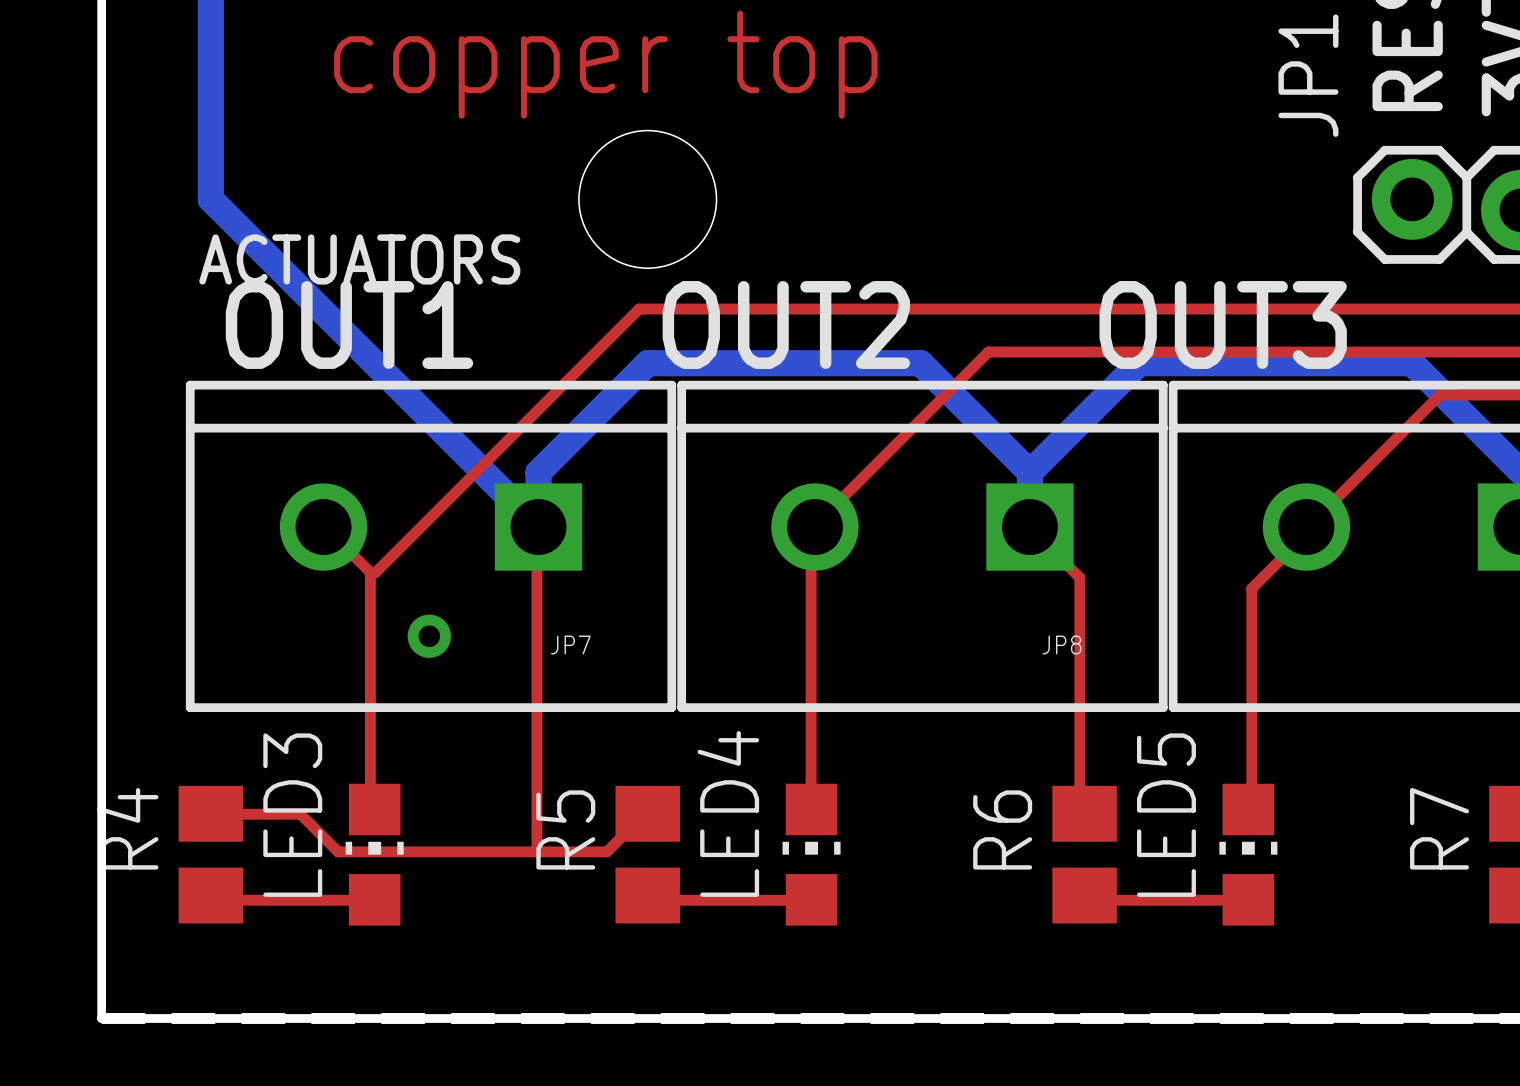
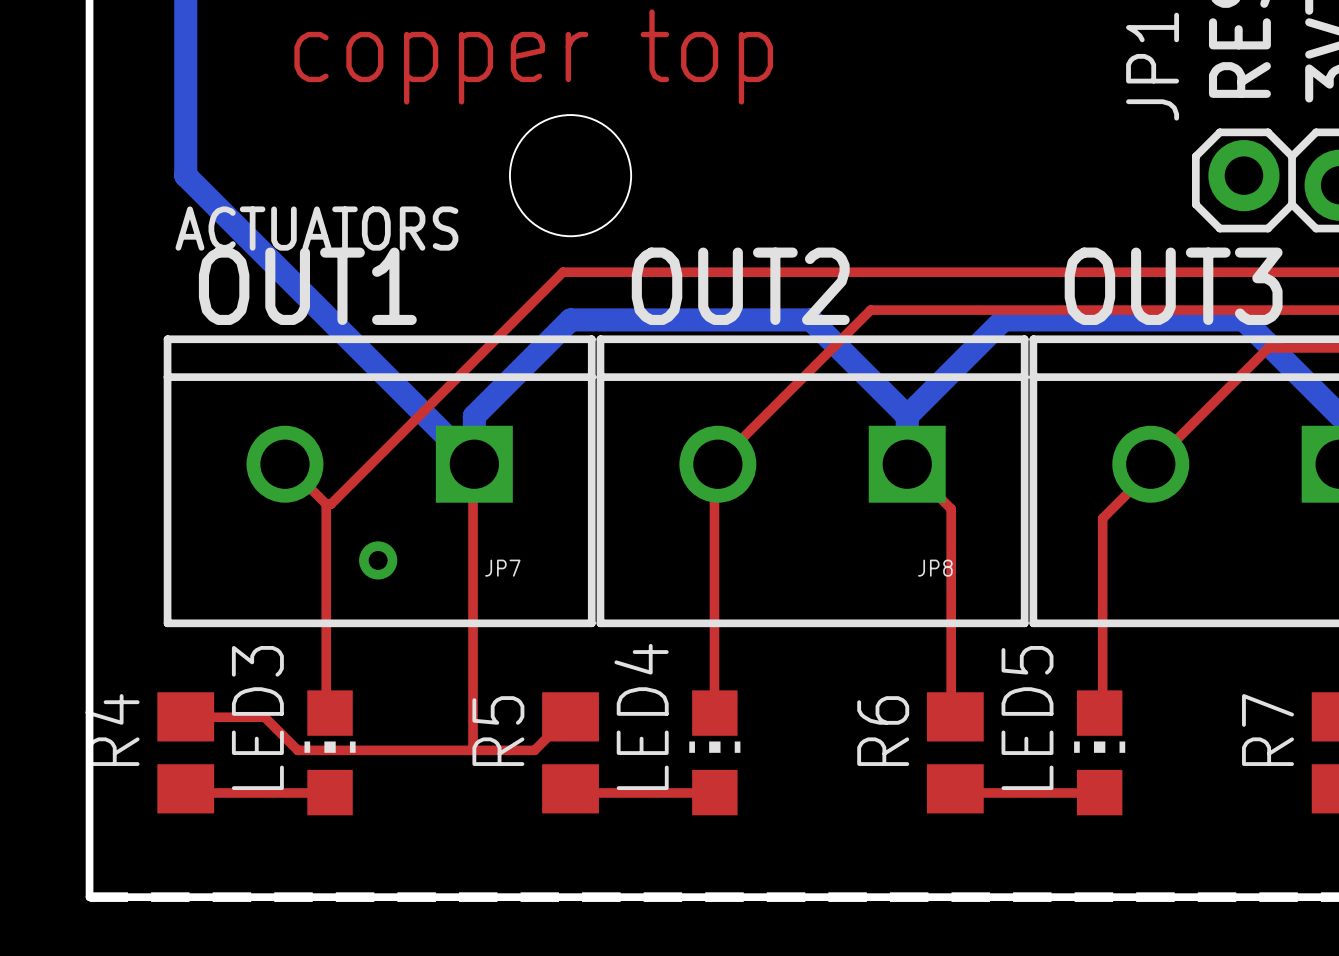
text position: OUT2 (786, 324) -> OUT2 (740, 286)
text position: OUT3 (1223, 324) -> OUT3 (1173, 286)

